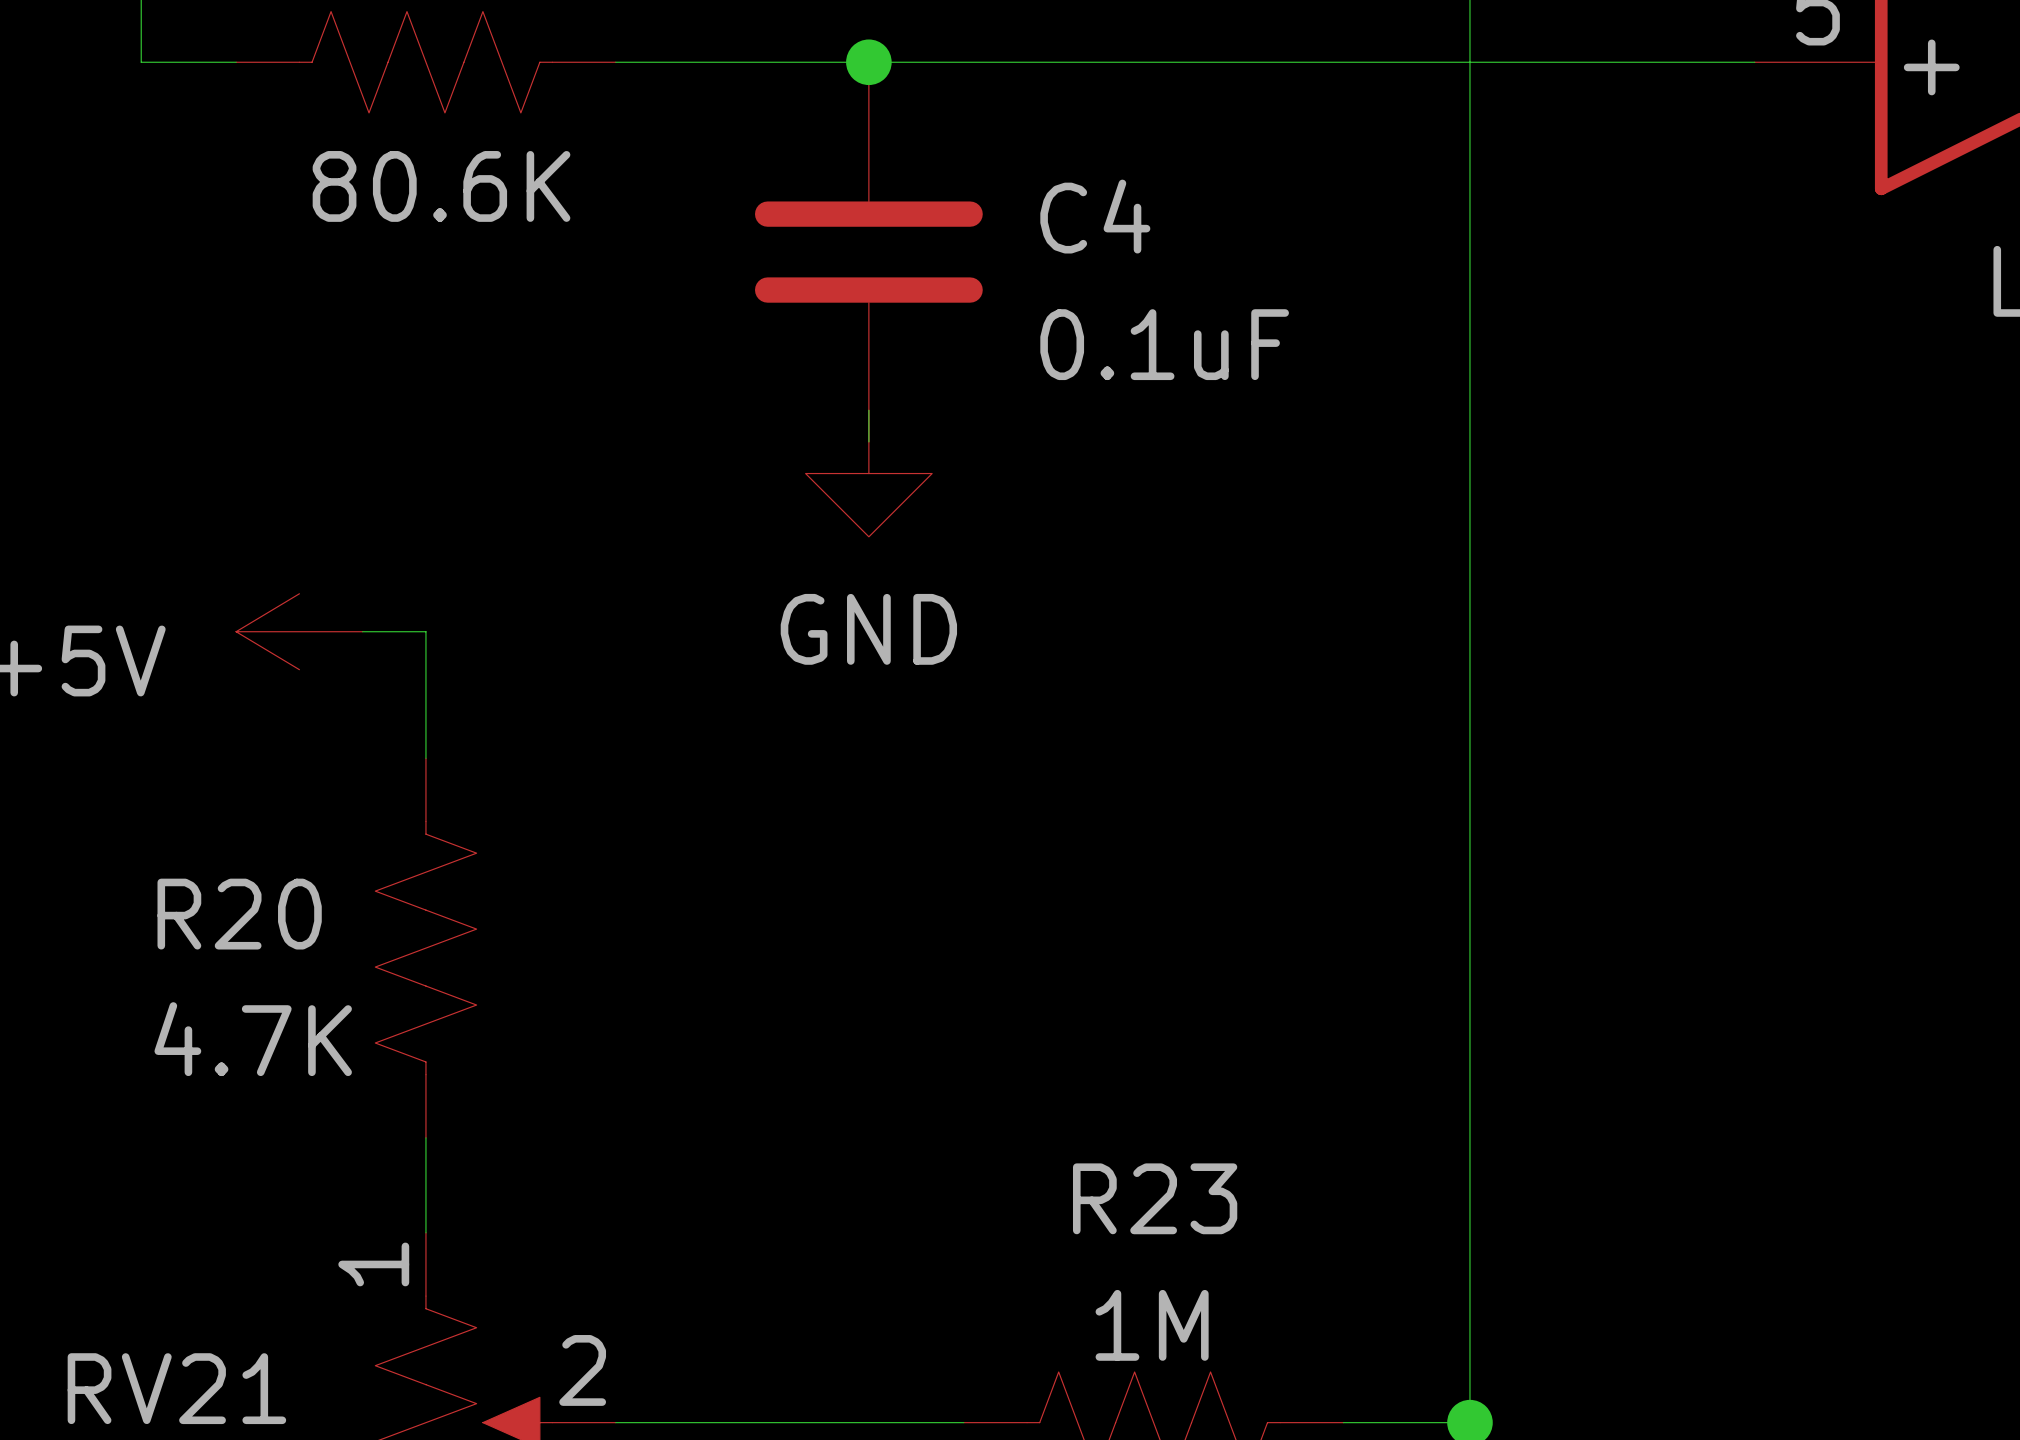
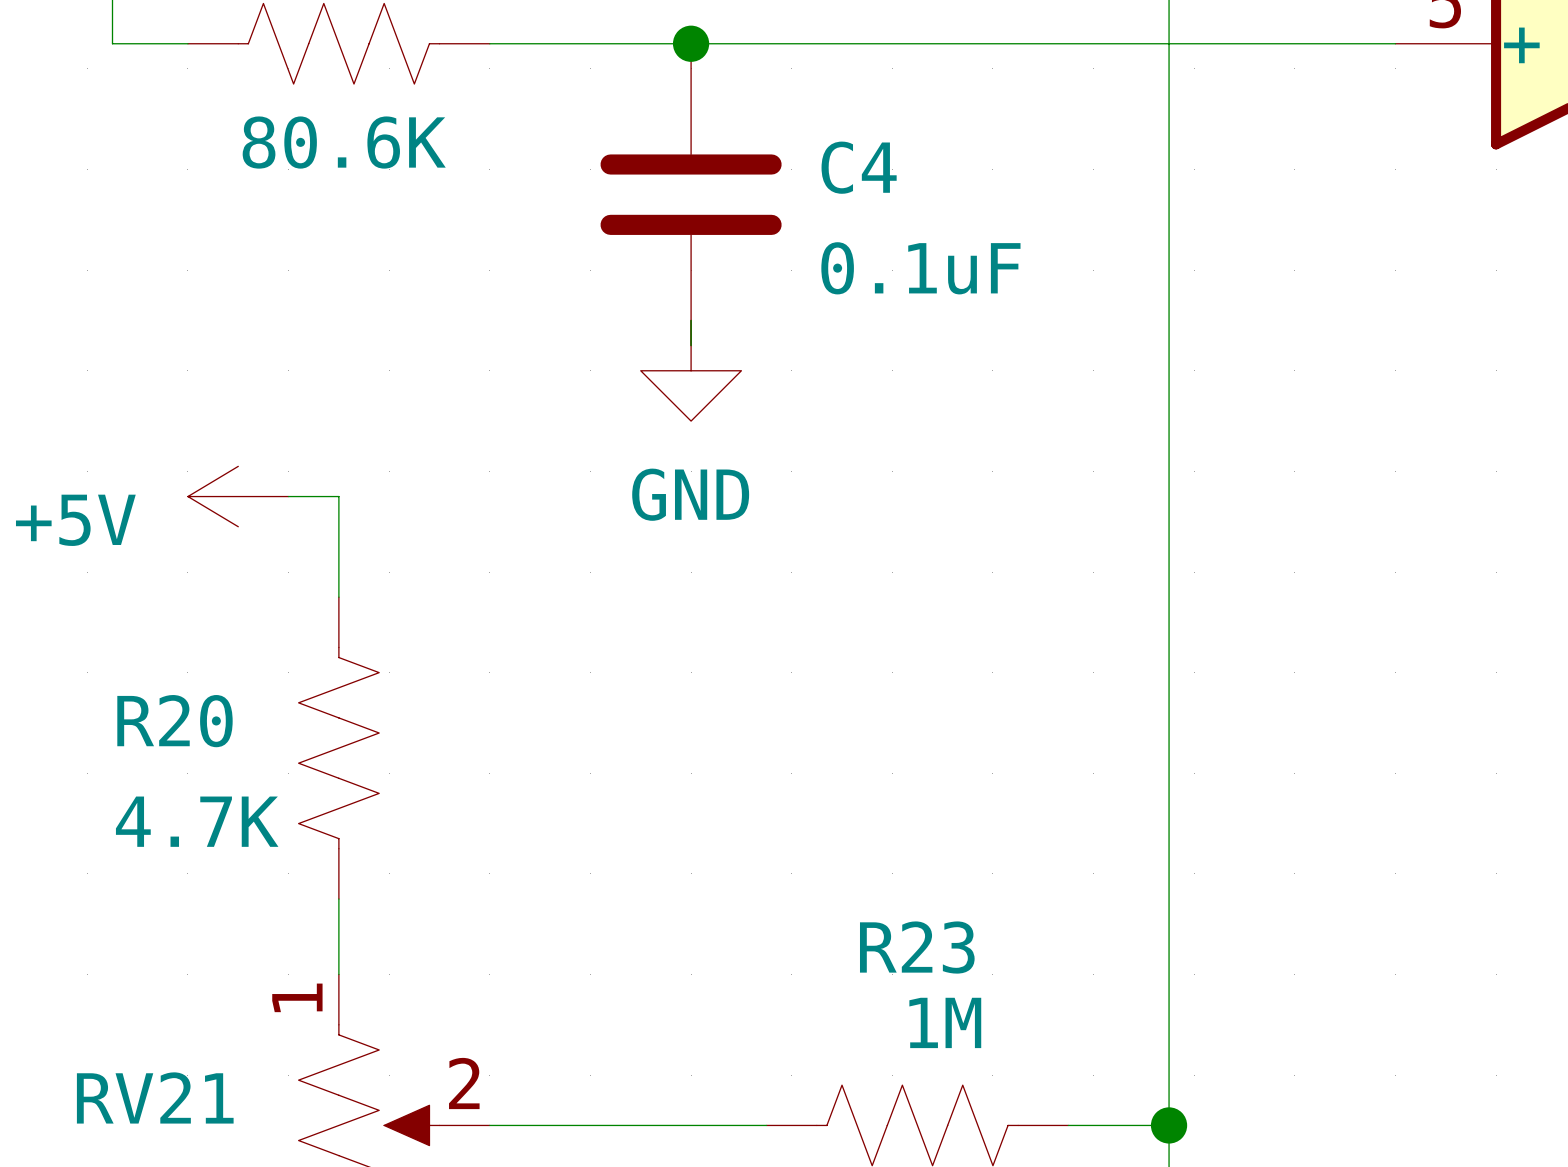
R23 value position: 1M (1152, 1325) -> 1M (945, 1022)

